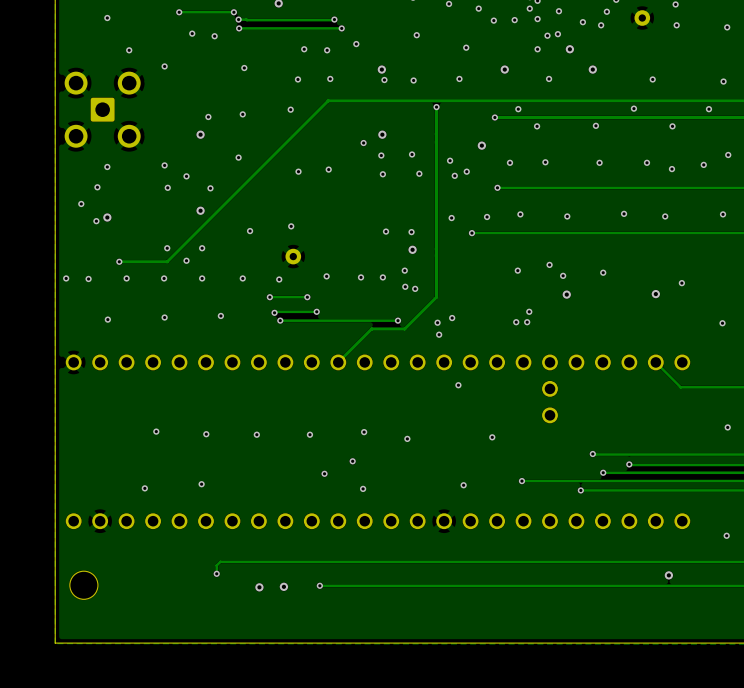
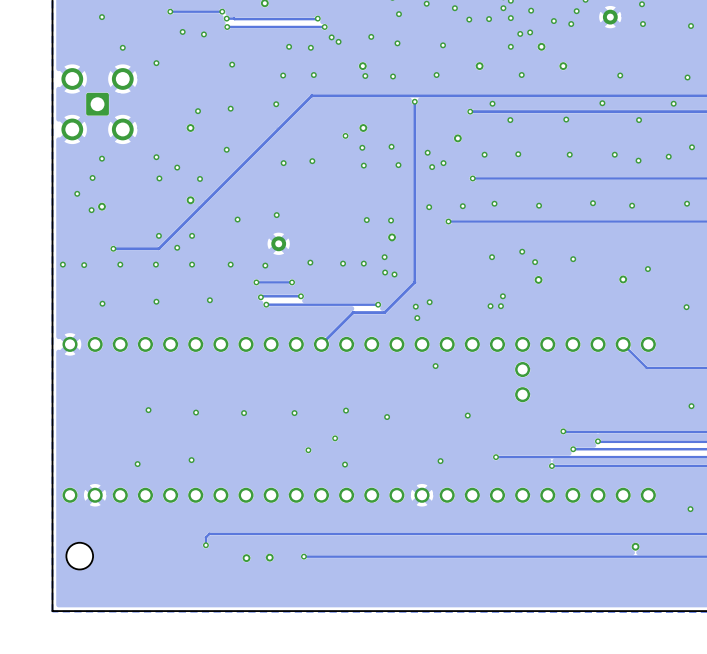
via: none -> (398, 14)
via: (416, 35) -> none
via: none -> (371, 36)
via: none -> (331, 37)
via: none -> (397, 43)

